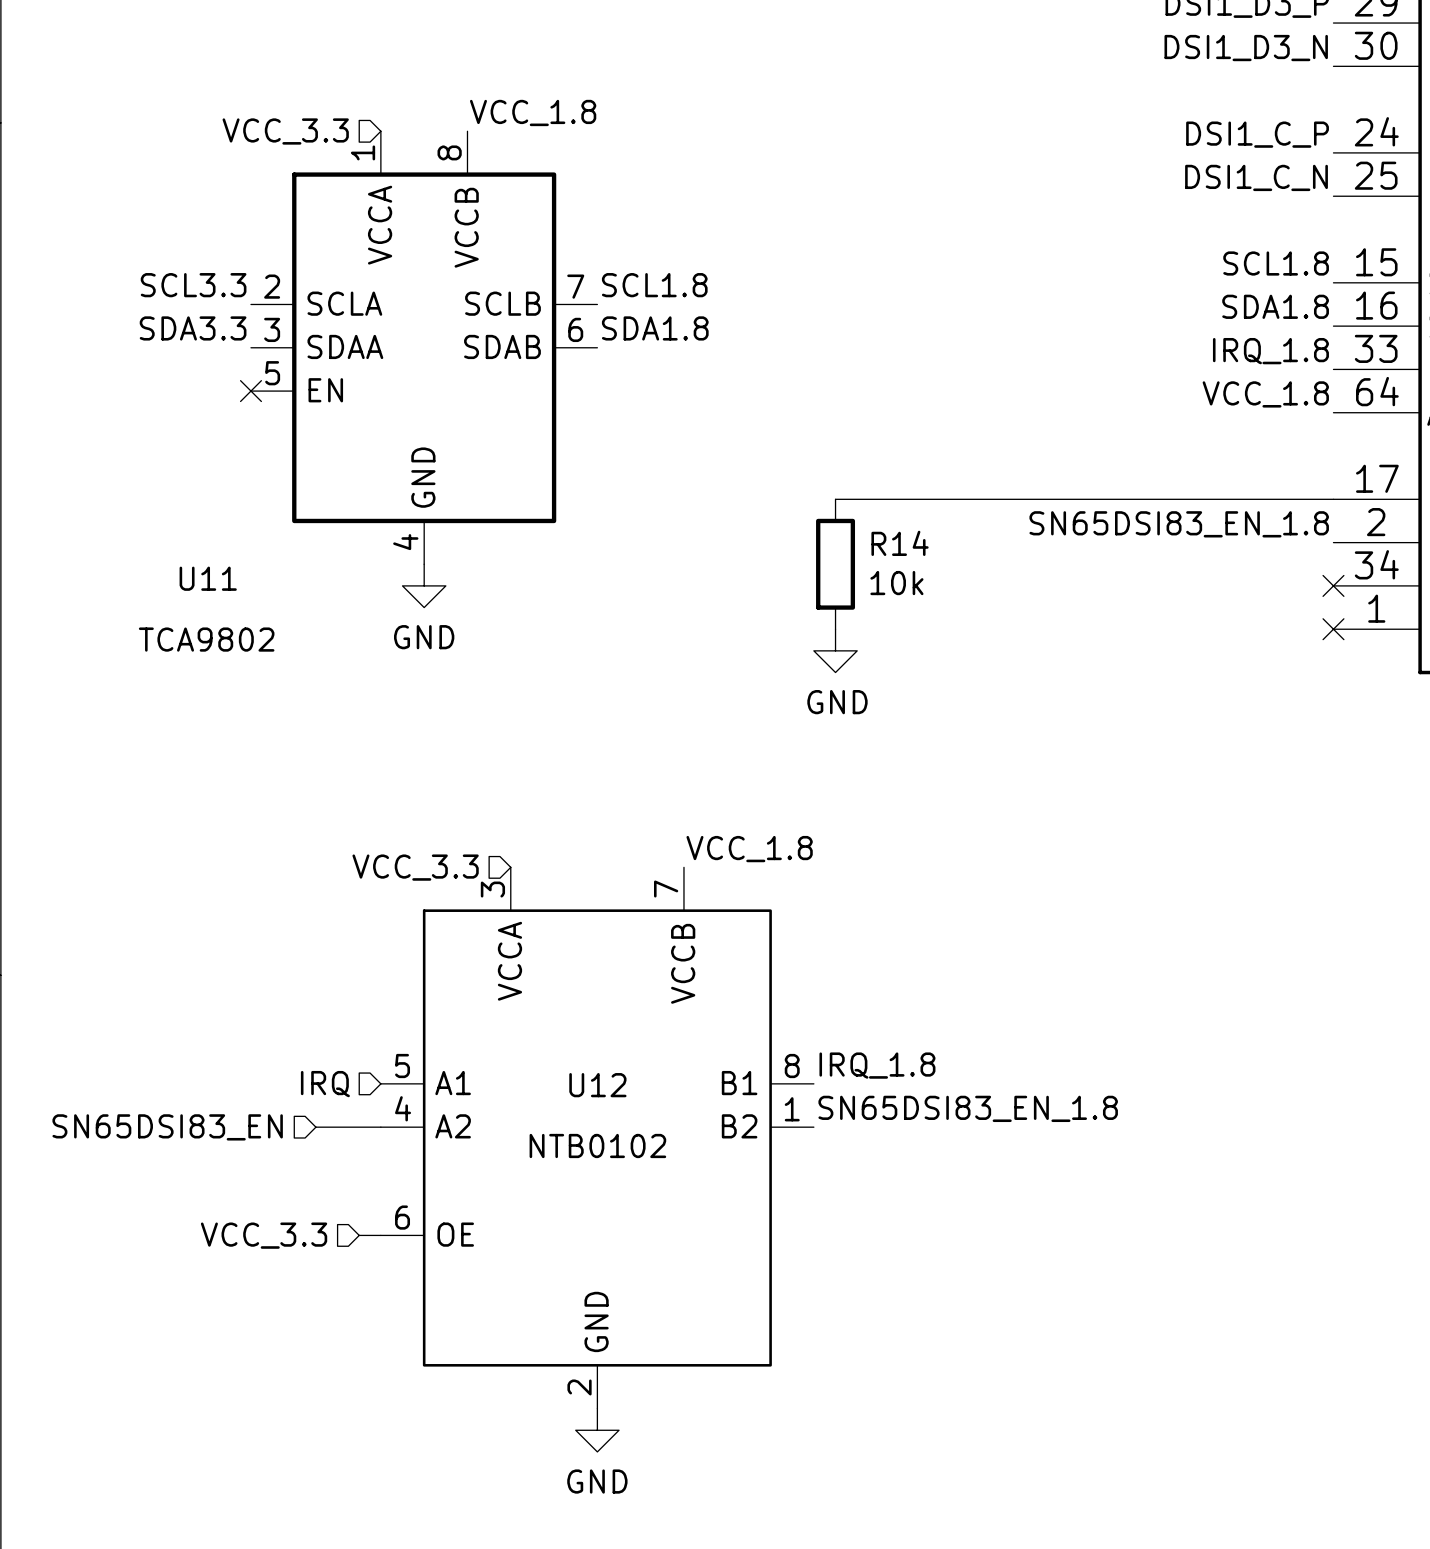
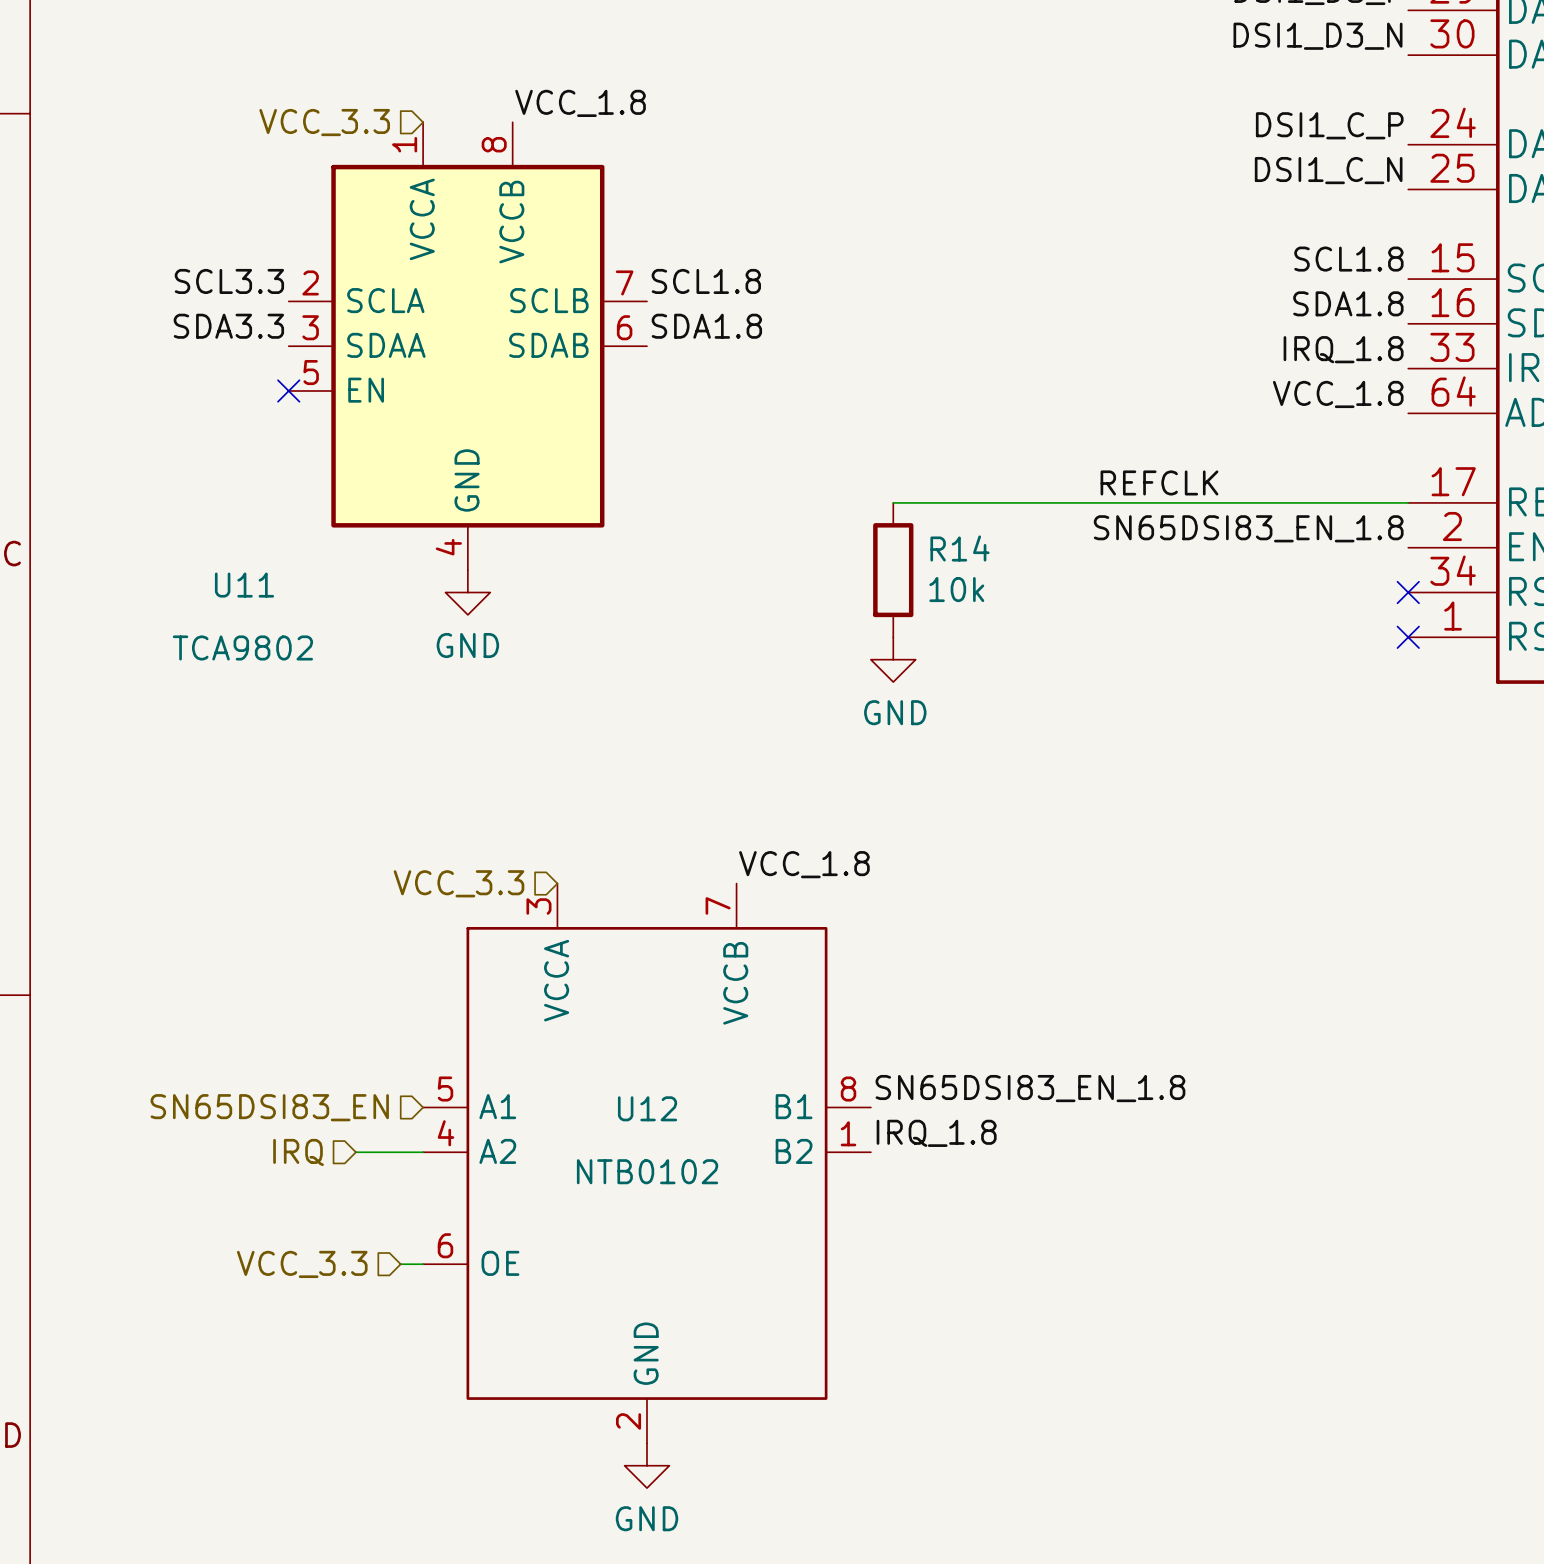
label: none -> REFCLK (1159, 482)
label: IRQ_1.8 (877, 1065) -> SN65DSI83_EN_1.8 (1030, 1088)
hierarchical label: IRQ (325, 1084) -> SN65DSI83_EN (269, 1107)
label: SN65DSI83_EN_1.8 (968, 1108) -> IRQ_1.8 (936, 1133)
hierarchical label: SN65DSI83_EN (167, 1127) -> IRQ (298, 1152)

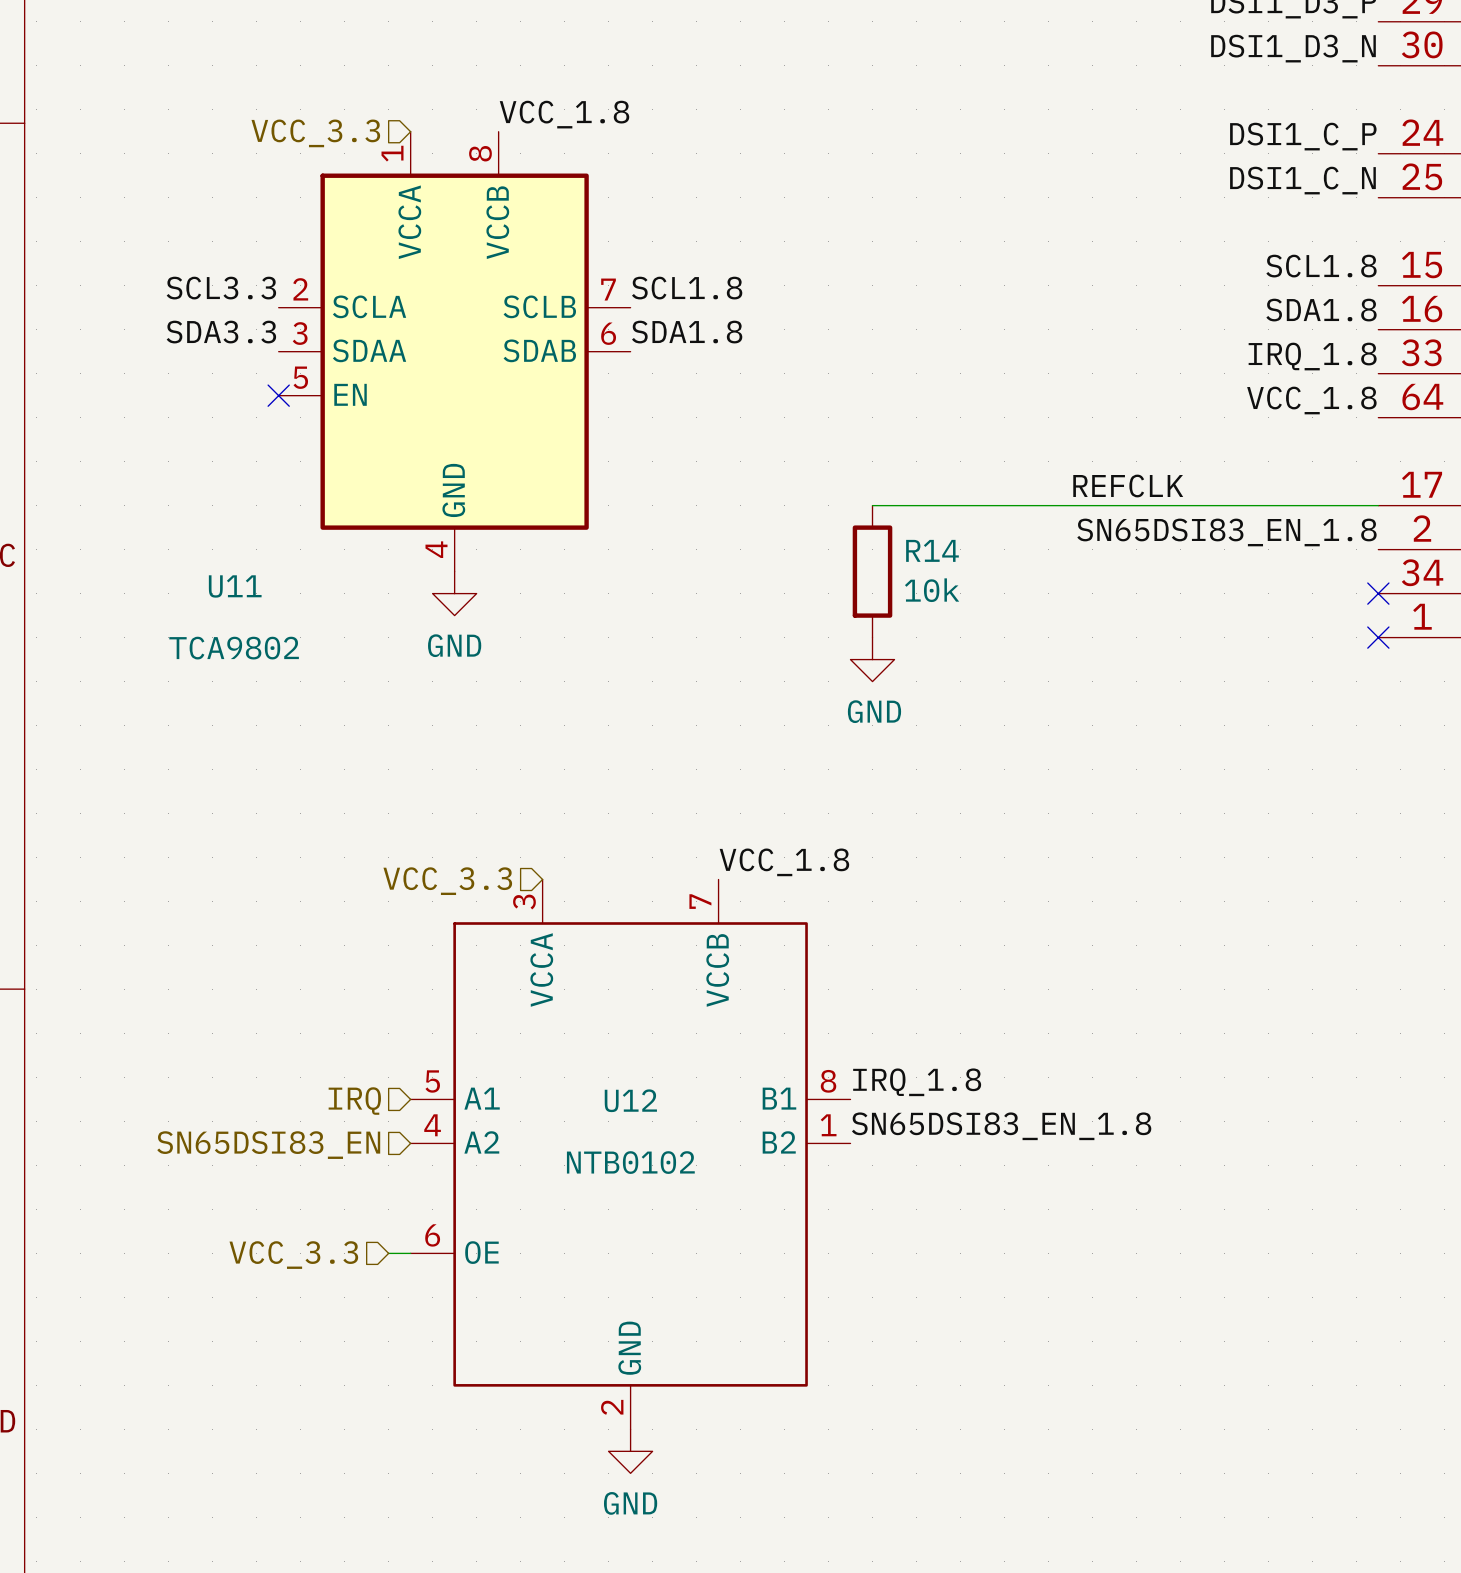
label: SN65DSI83_EN_1.8 (1030, 1088) -> IRQ_1.8 (917, 1082)
hierarchical label: SN65DSI83_EN (269, 1107) -> IRQ (354, 1101)
label: IRQ_1.8 (936, 1133) -> SN65DSI83_EN_1.8 (1001, 1126)
hierarchical label: none -> SN65DSI83_EN (268, 1145)
hierarchical label: IRQ (298, 1152) -> none
wire: (355, 1152) (423, 1152) -> none

